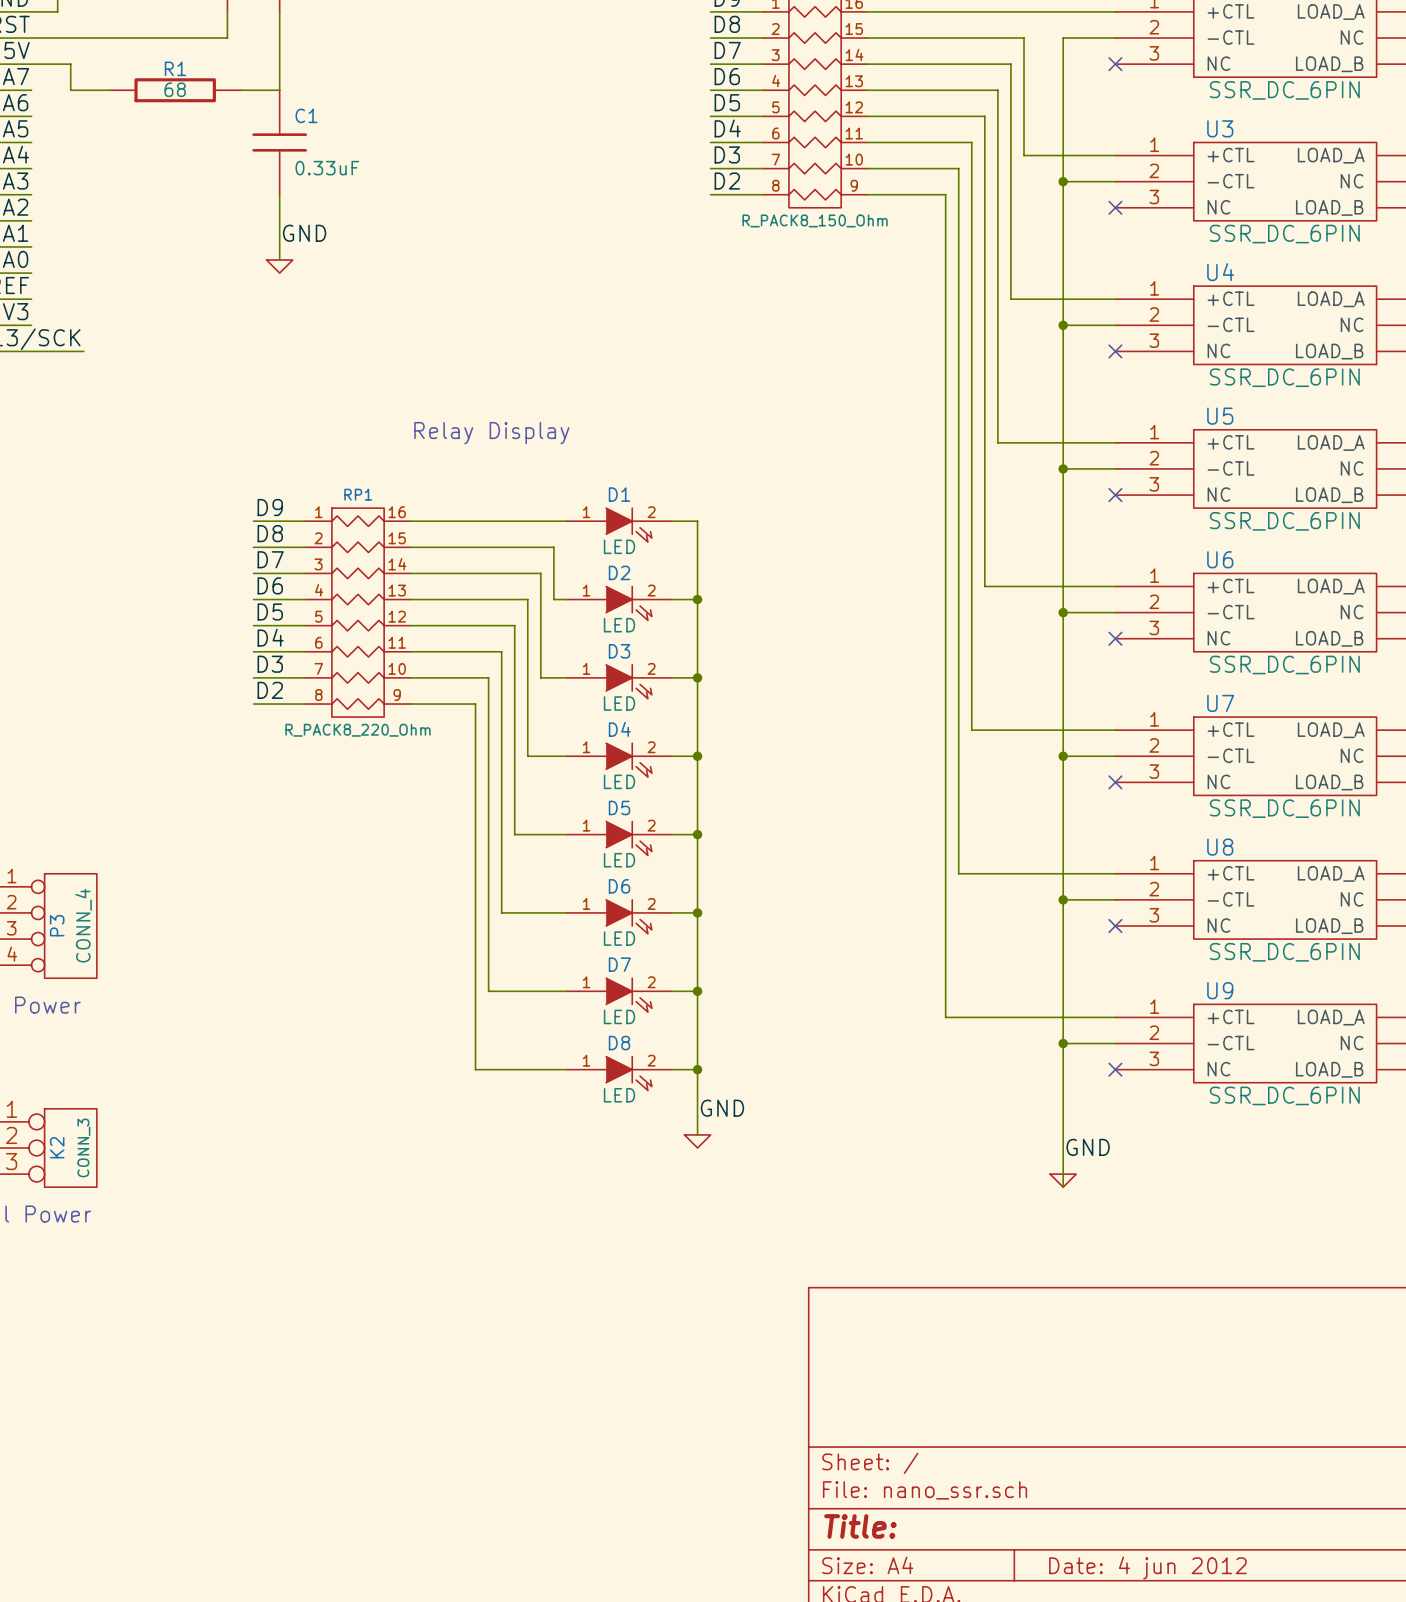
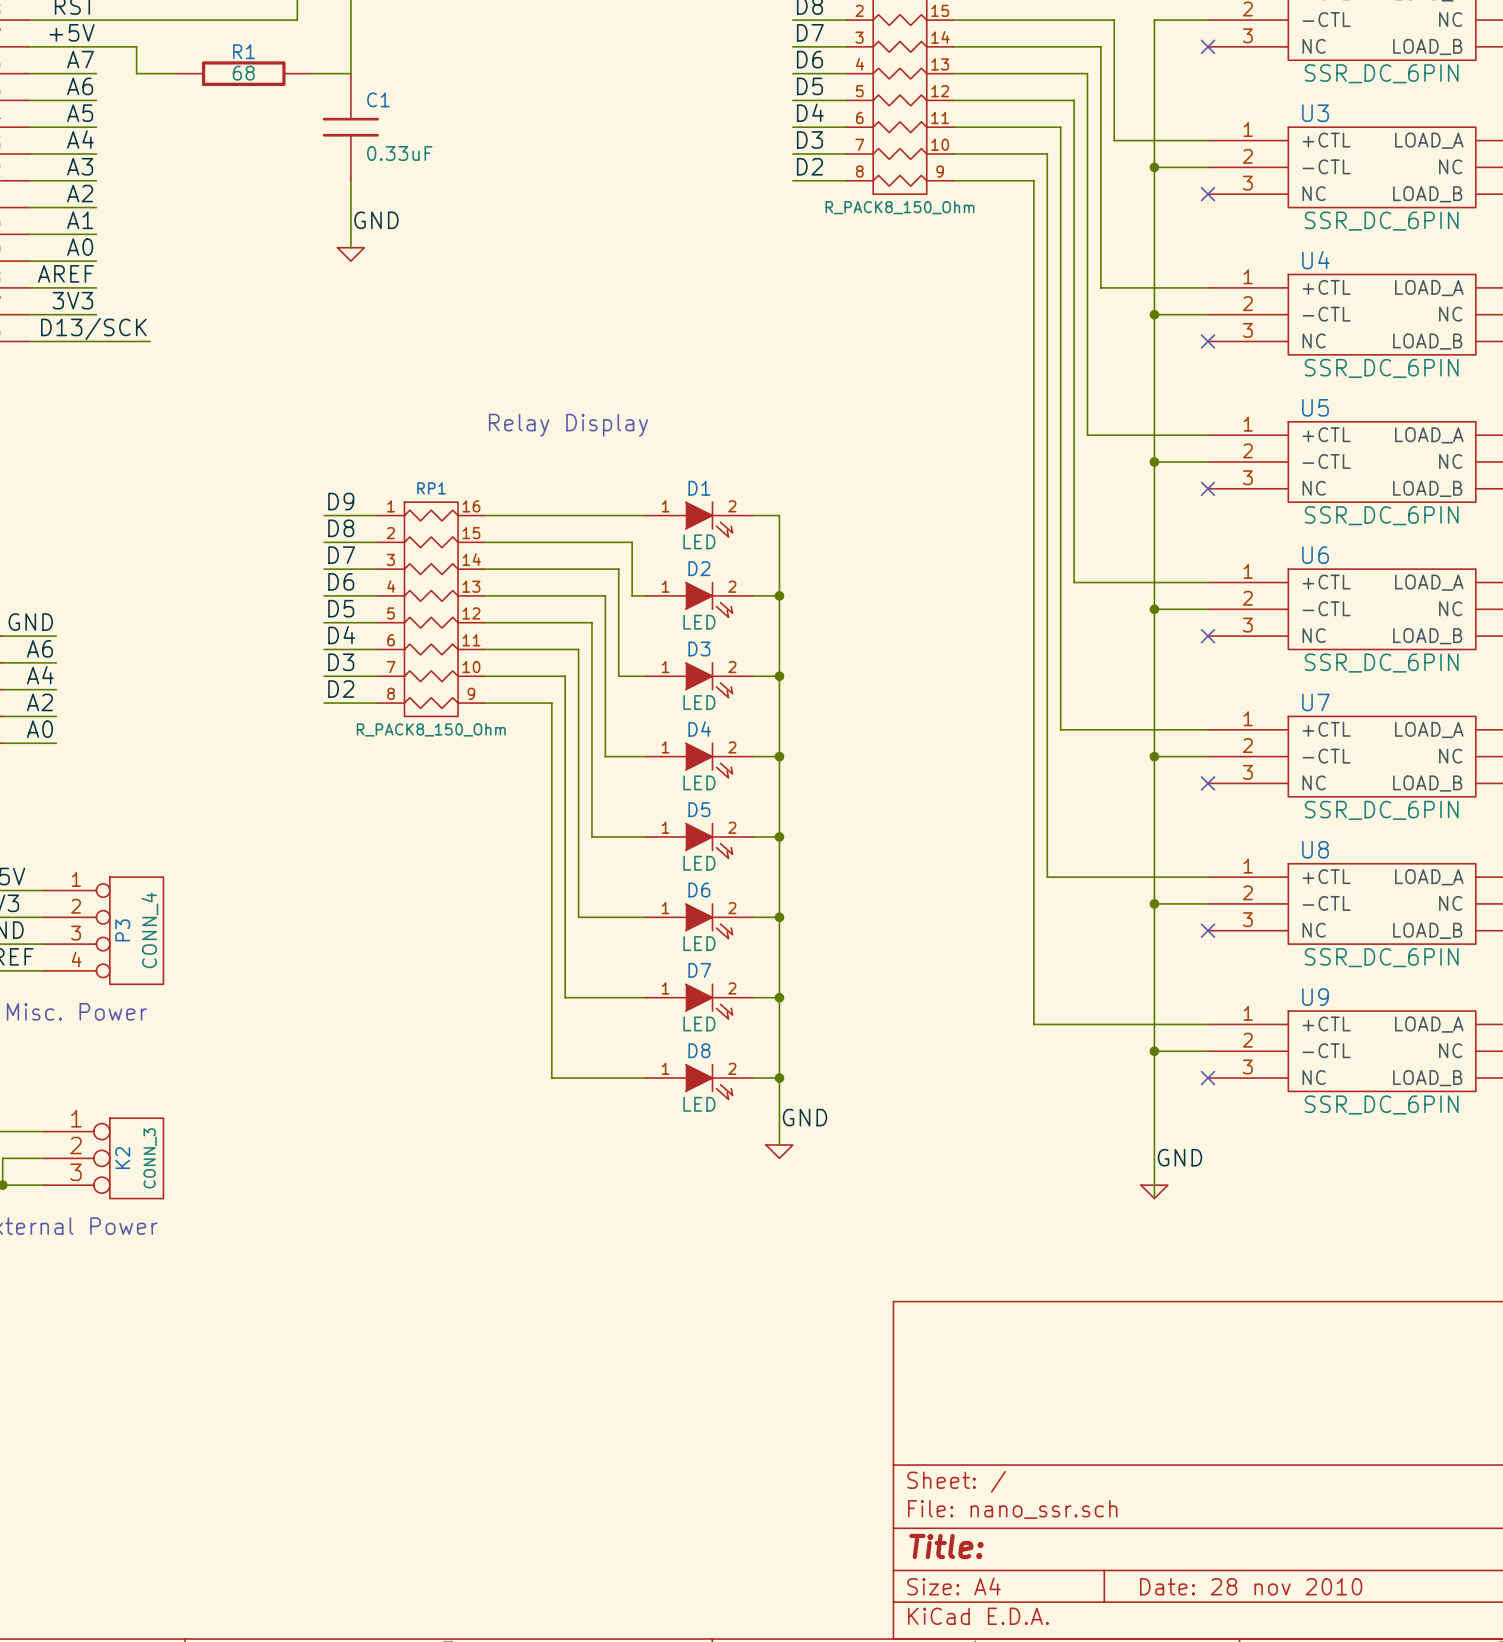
RP1 value: R_PACK8_220_Ohm (358, 730) -> R_PACK8_150_Ohm (431, 729)
title block: Date: 4 jun 2012 (1147, 1567) -> Date: 28 nov 2010 (1251, 1586)

